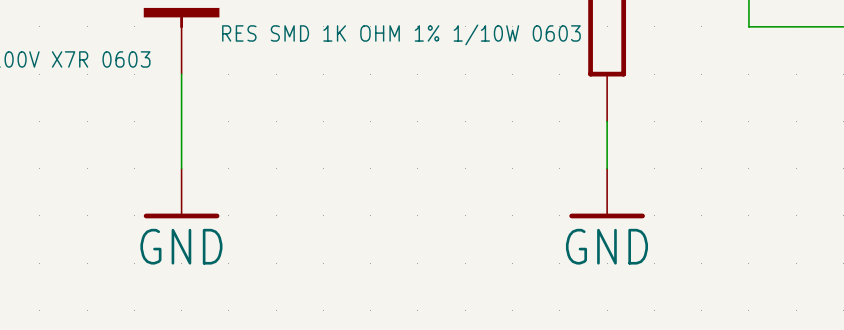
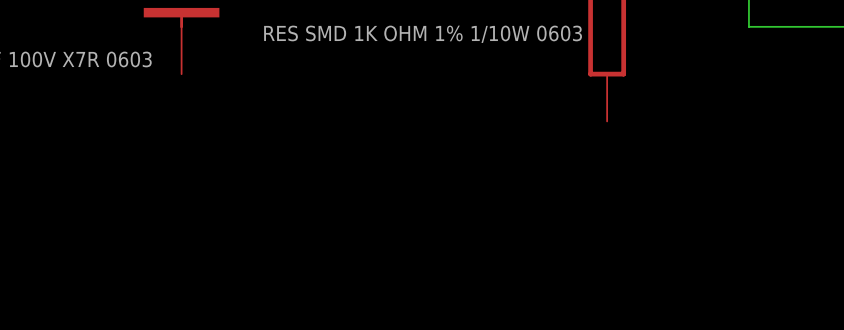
wire: (181, 74) (181, 168) -> none
wire: (607, 121) (607, 168) -> none
power symbol: GND (181, 193) -> none
power symbol: GND (607, 193) -> none

